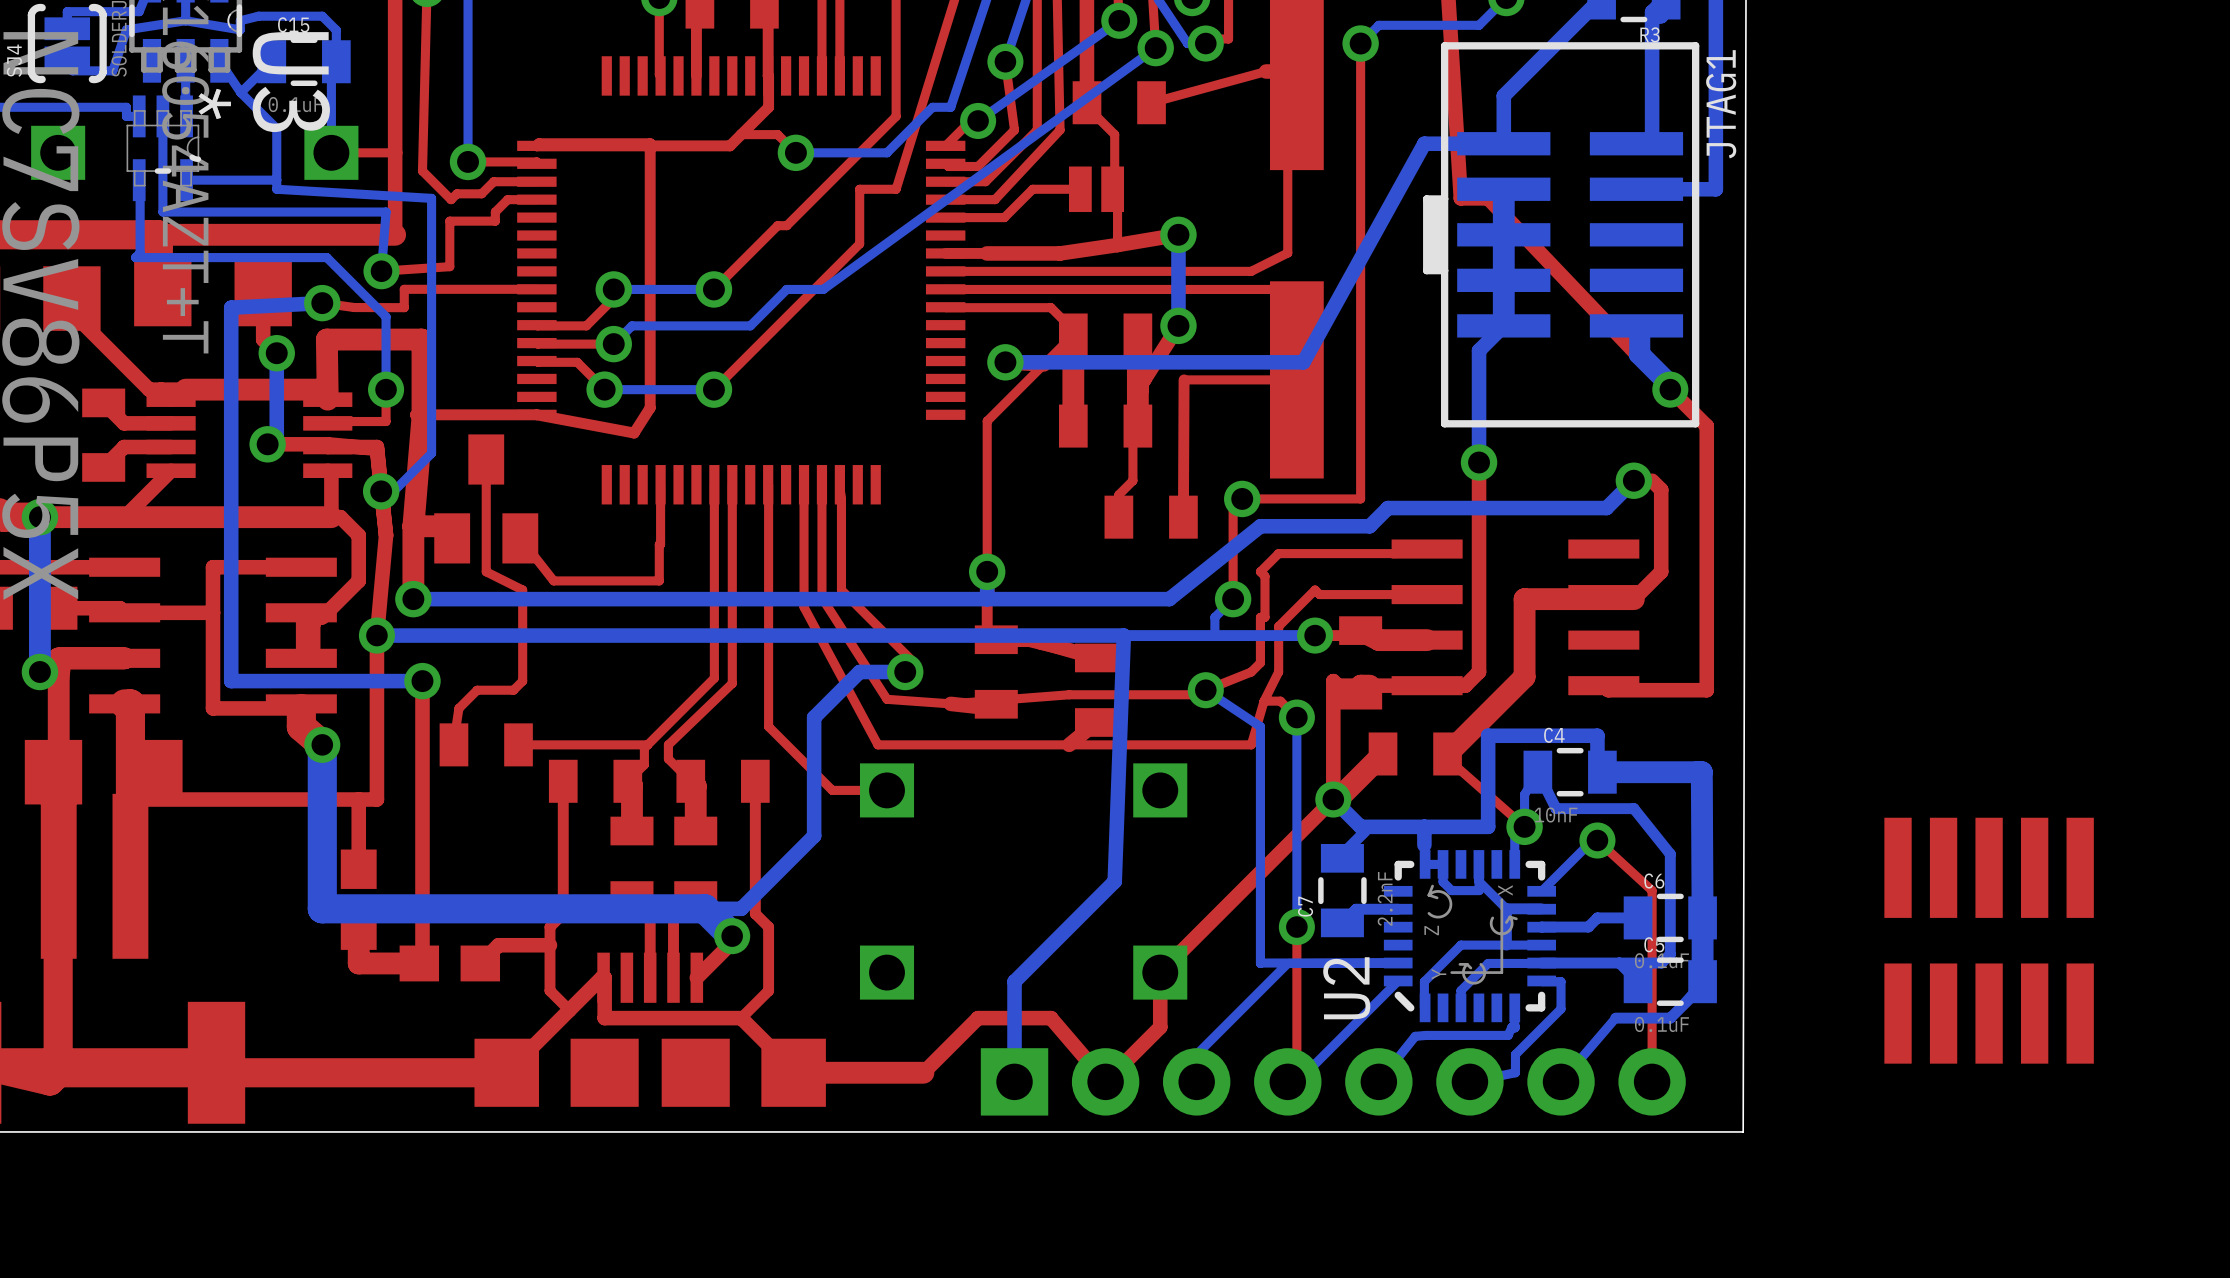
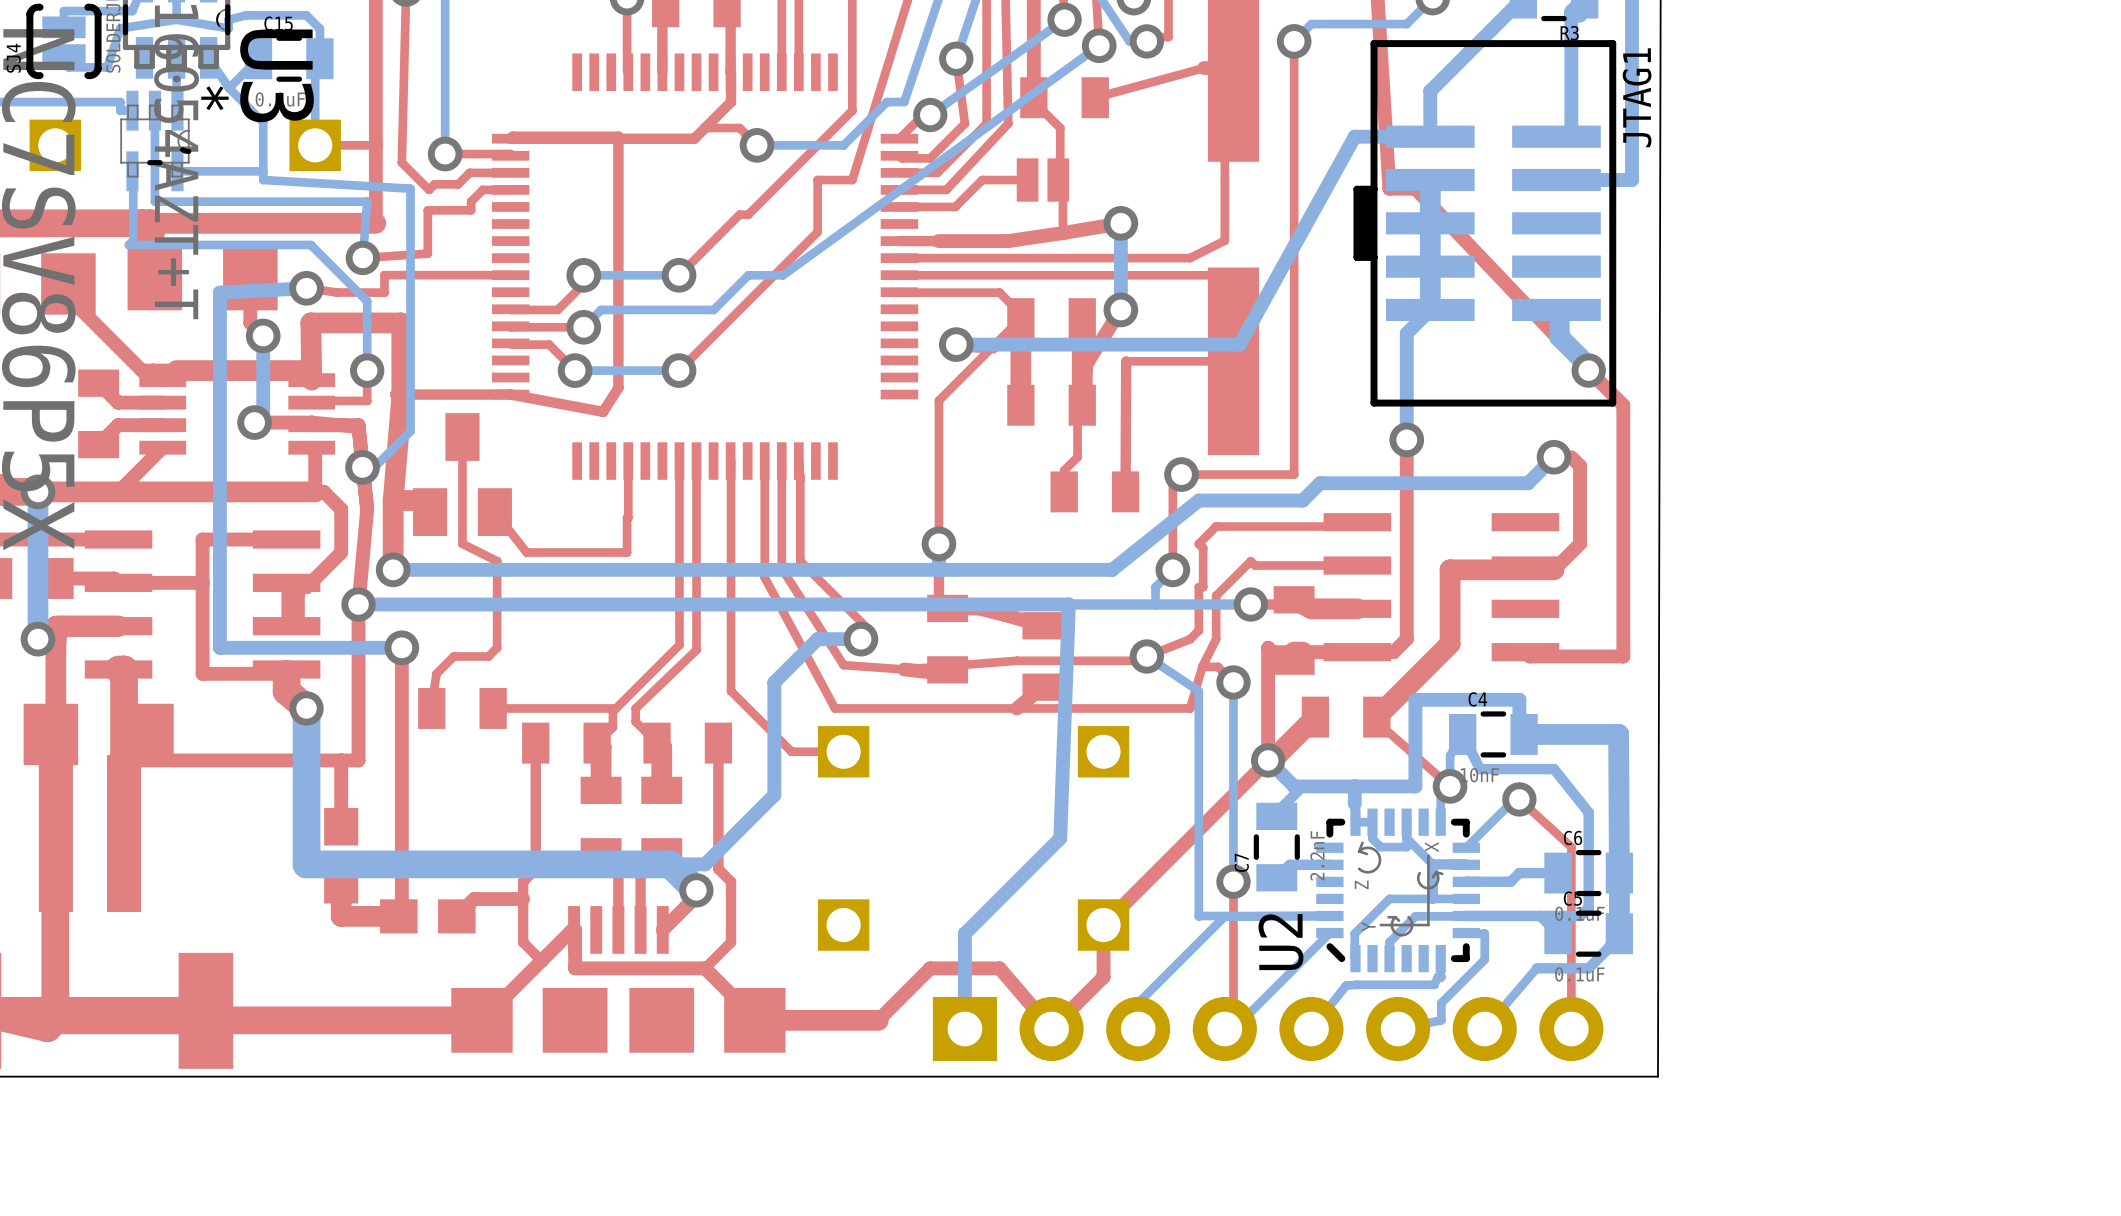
part: (1989, 940) -> none

